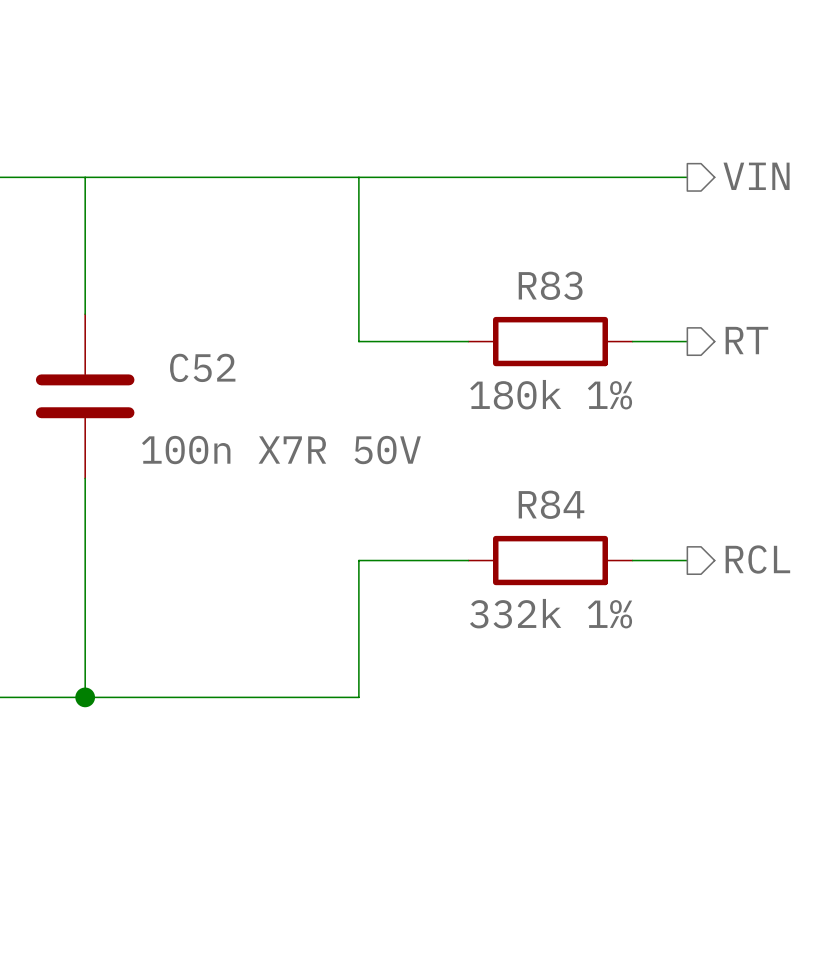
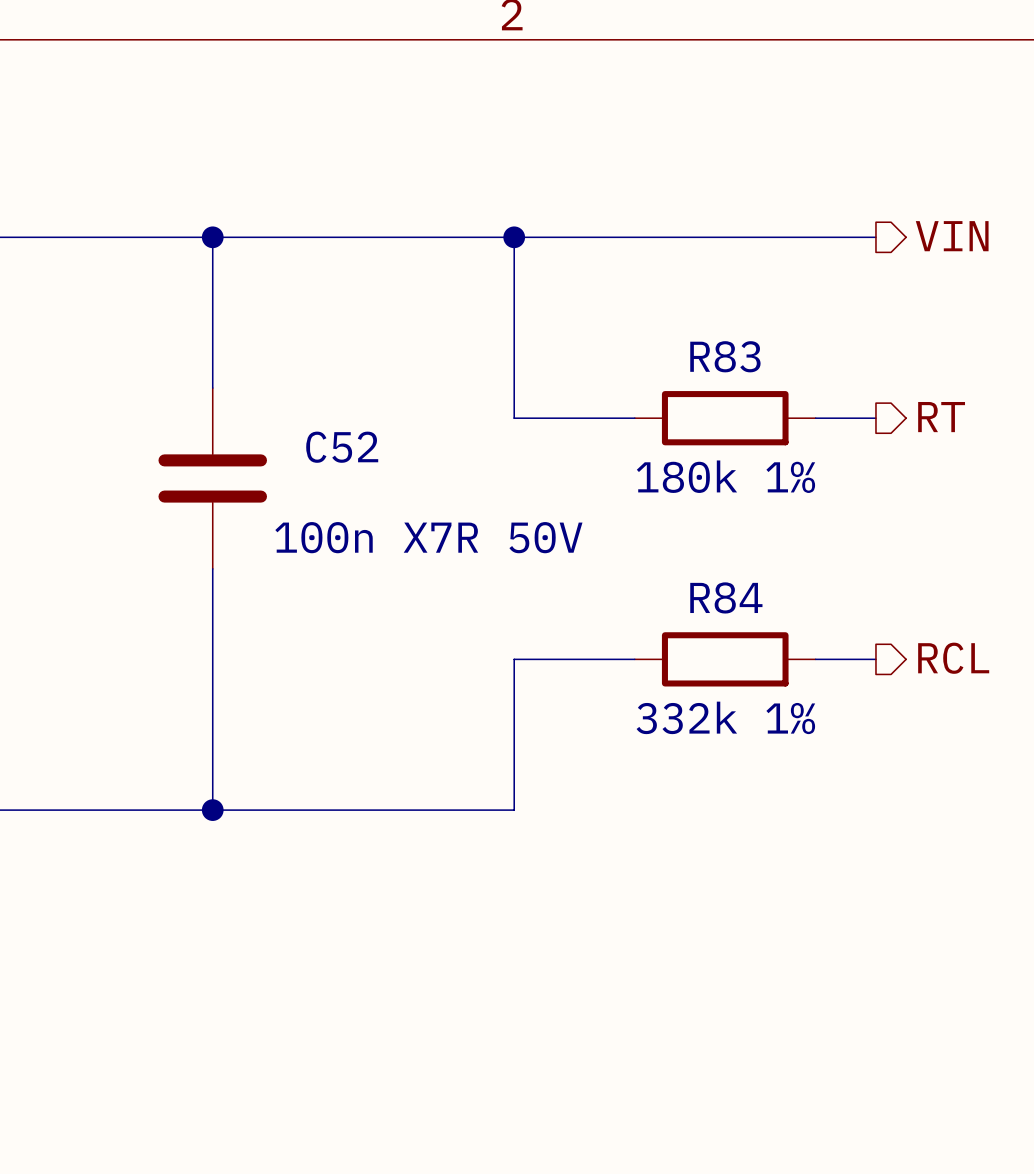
junction: none -> (212, 237)
junction: none -> (514, 237)

